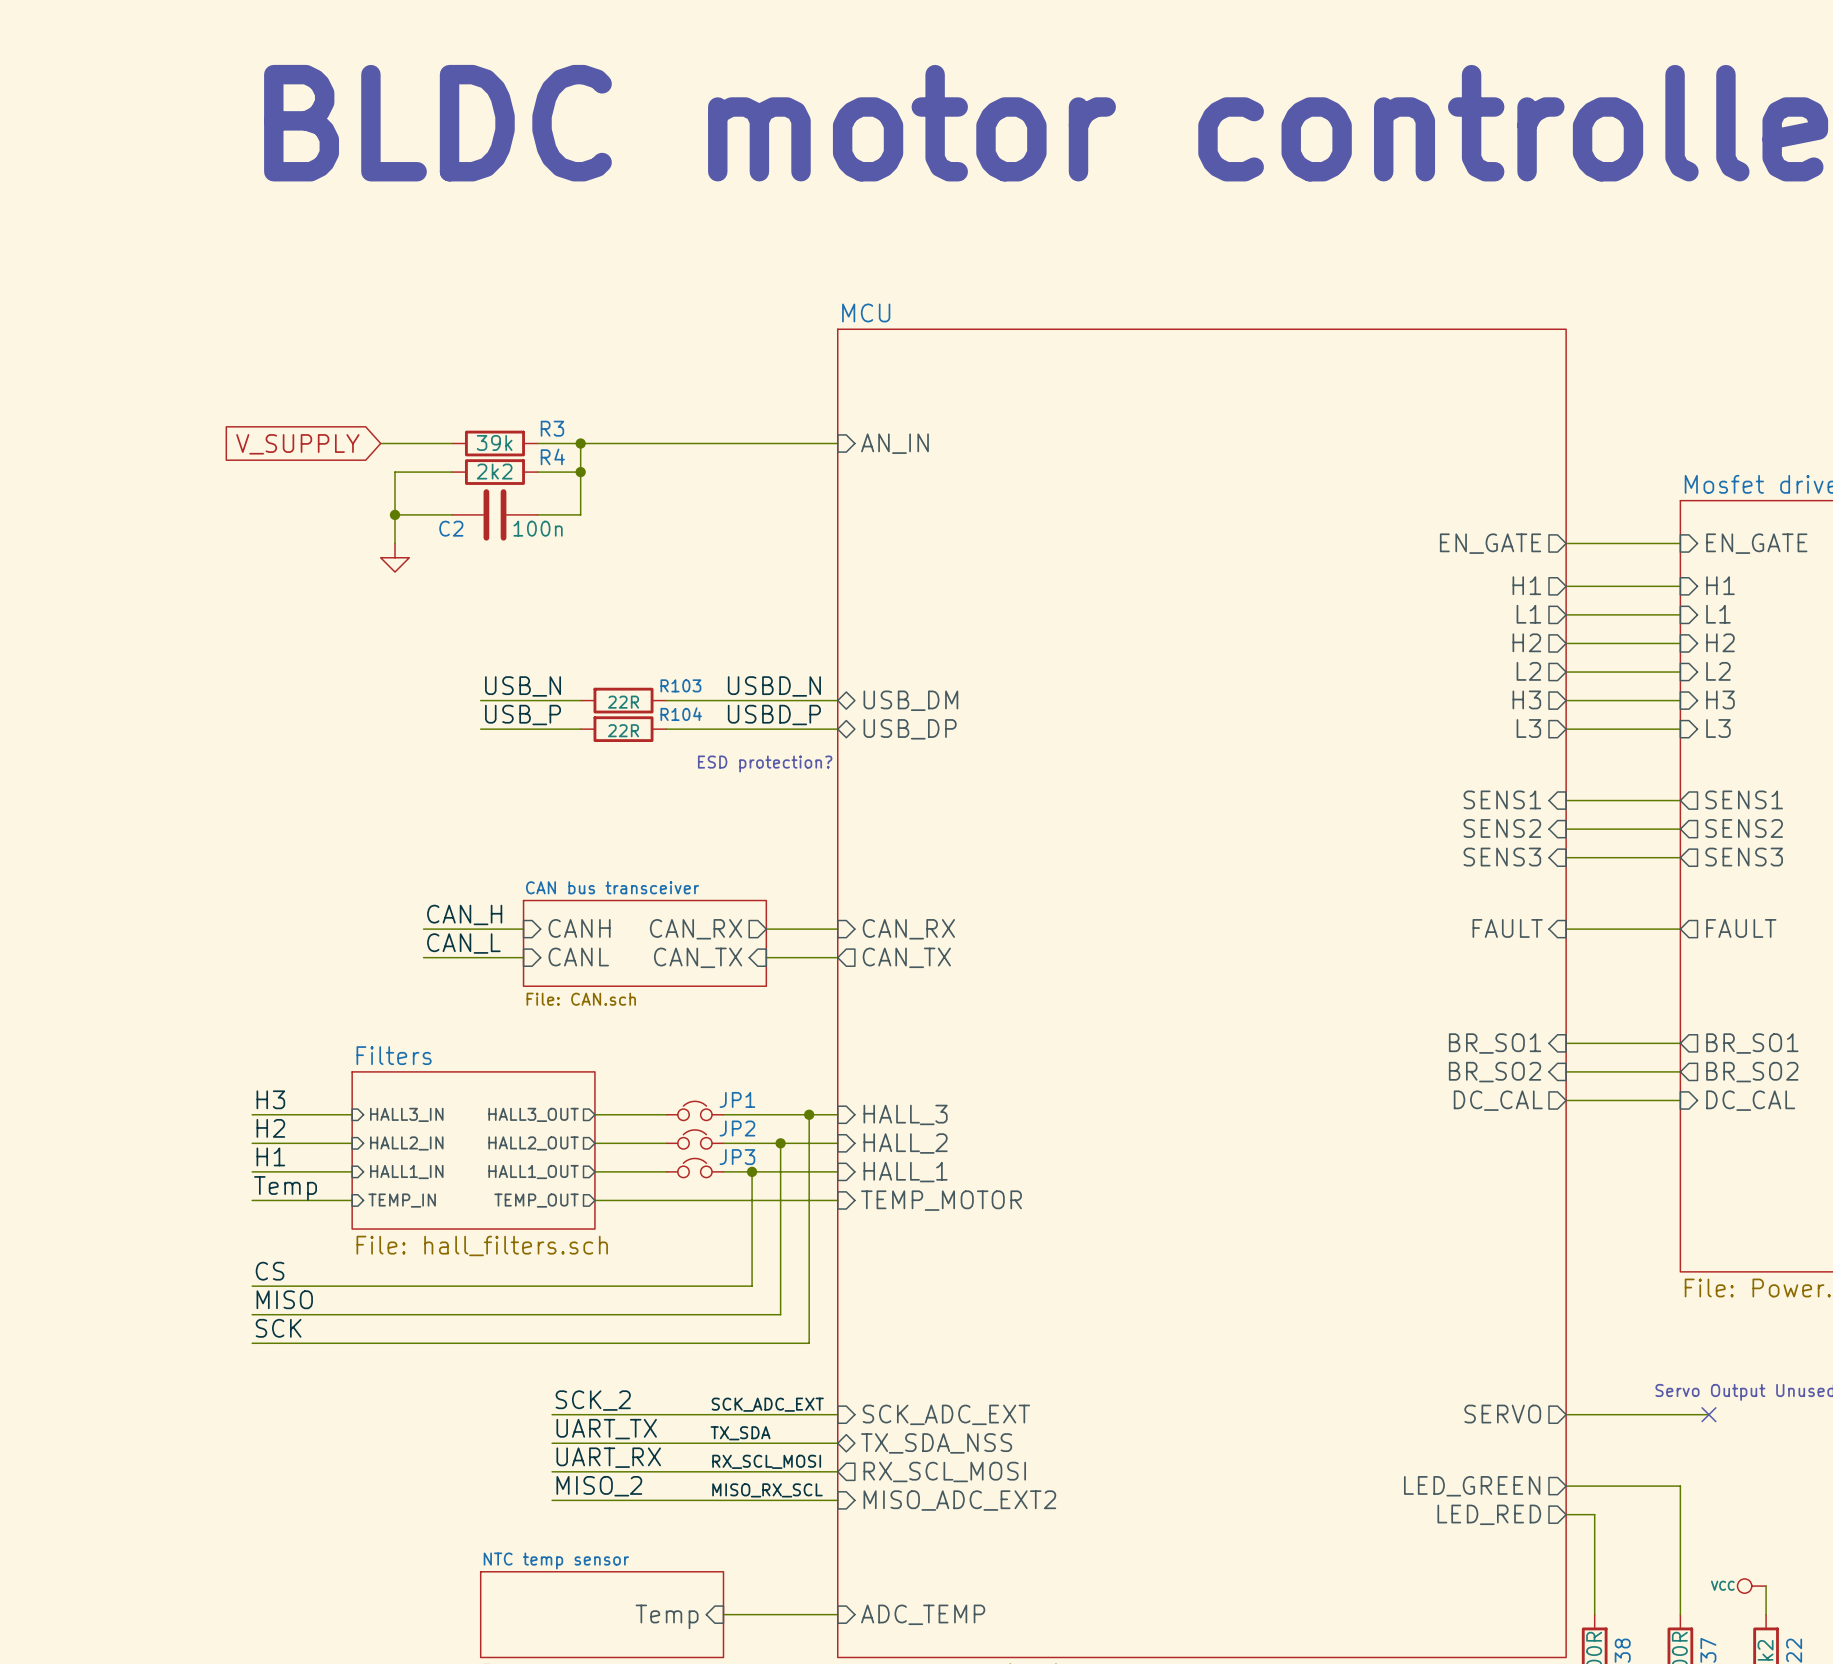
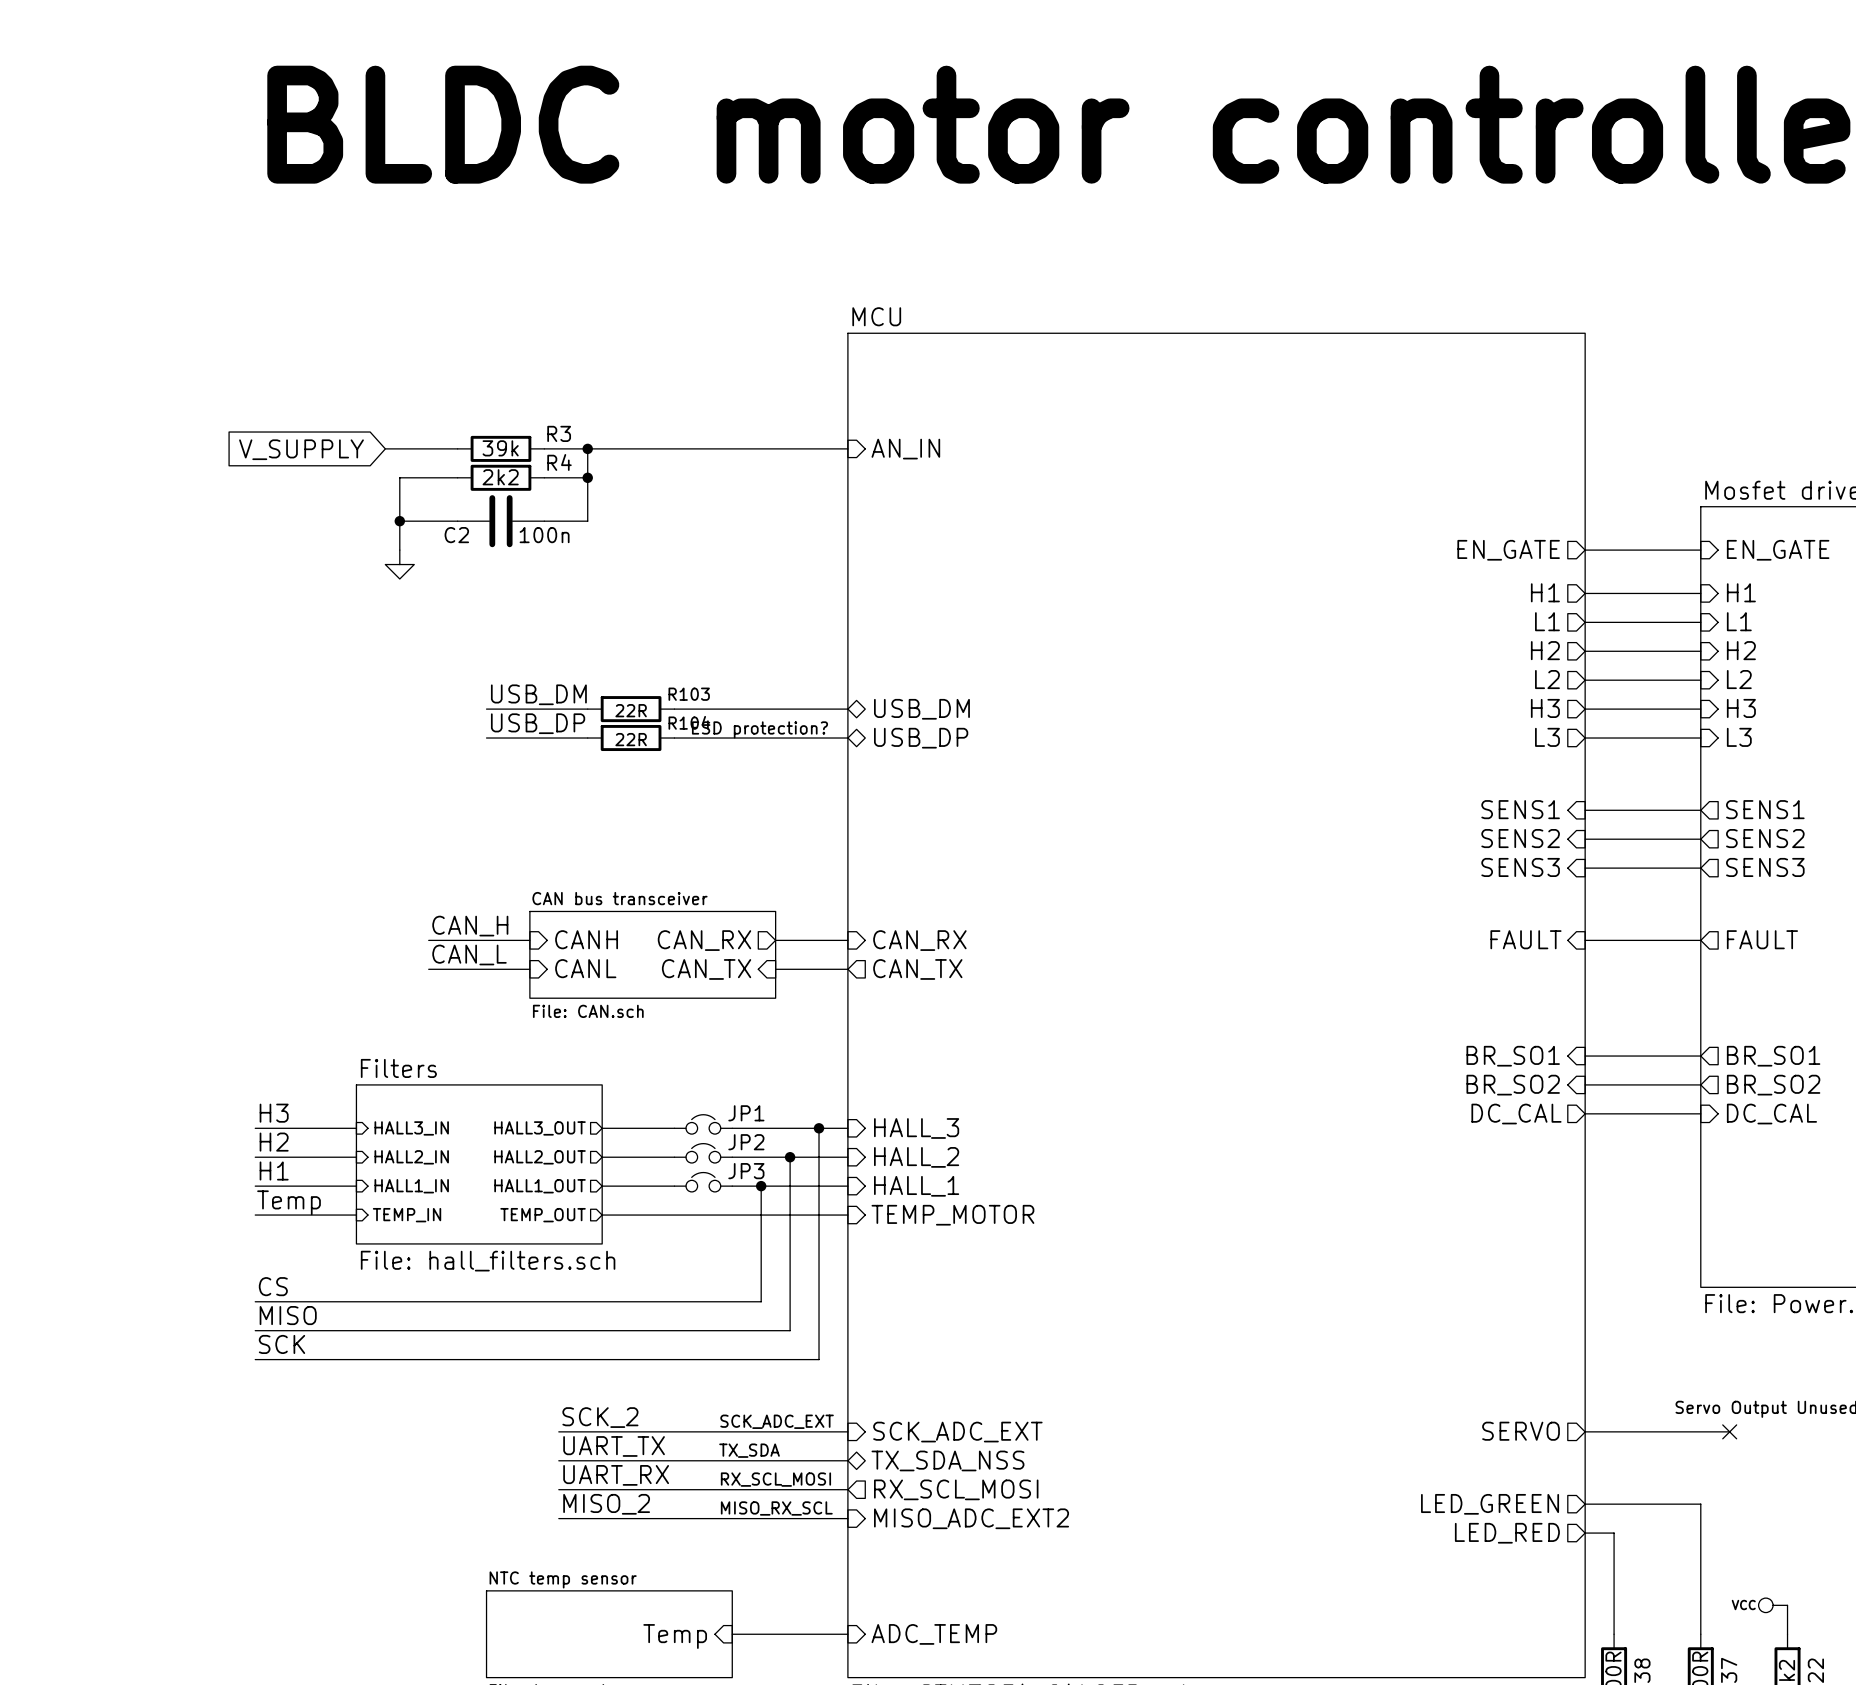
label: USB_N (523, 686) -> USB_DM (538, 694)
label: USBD_N (774, 686) -> none
label: USB_P (523, 715) -> USB_DP (538, 723)
label: USBD_P (774, 715) -> none
text position: ESD protection? (765, 763) -> ESD protection? (759, 729)

